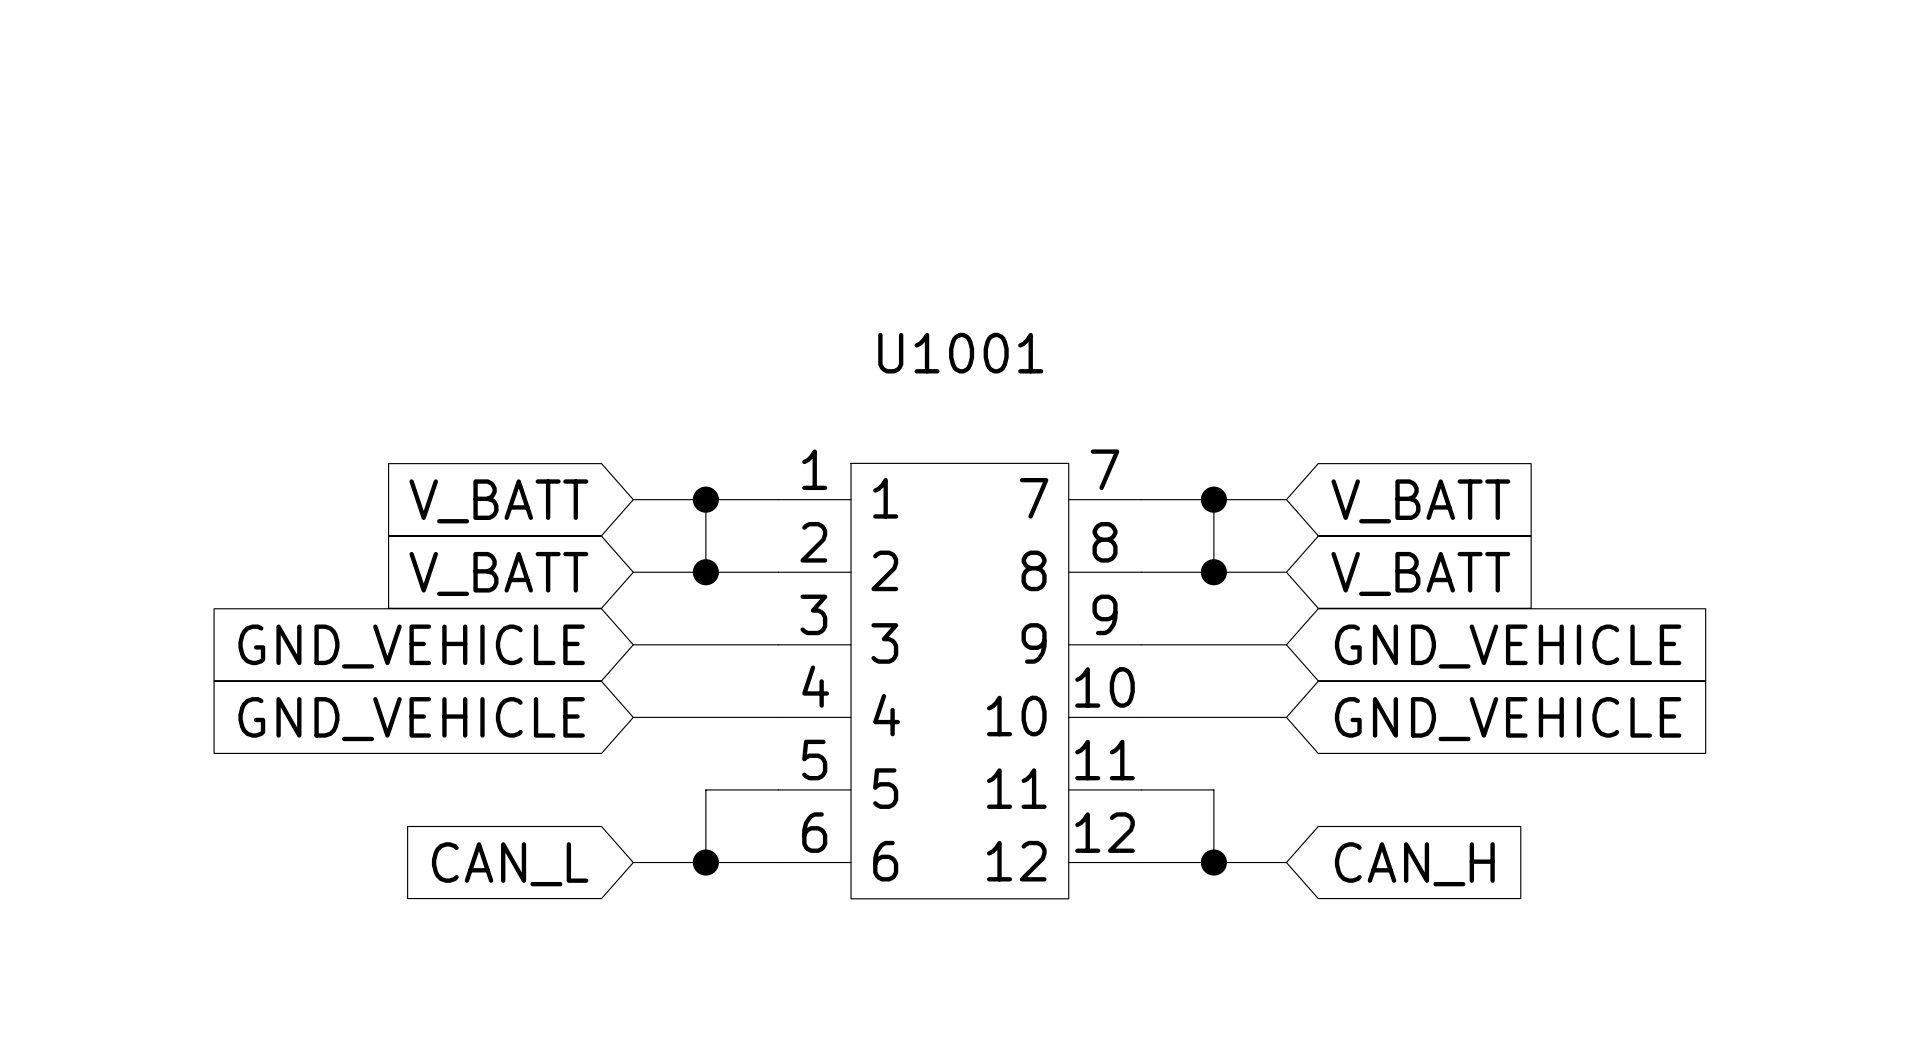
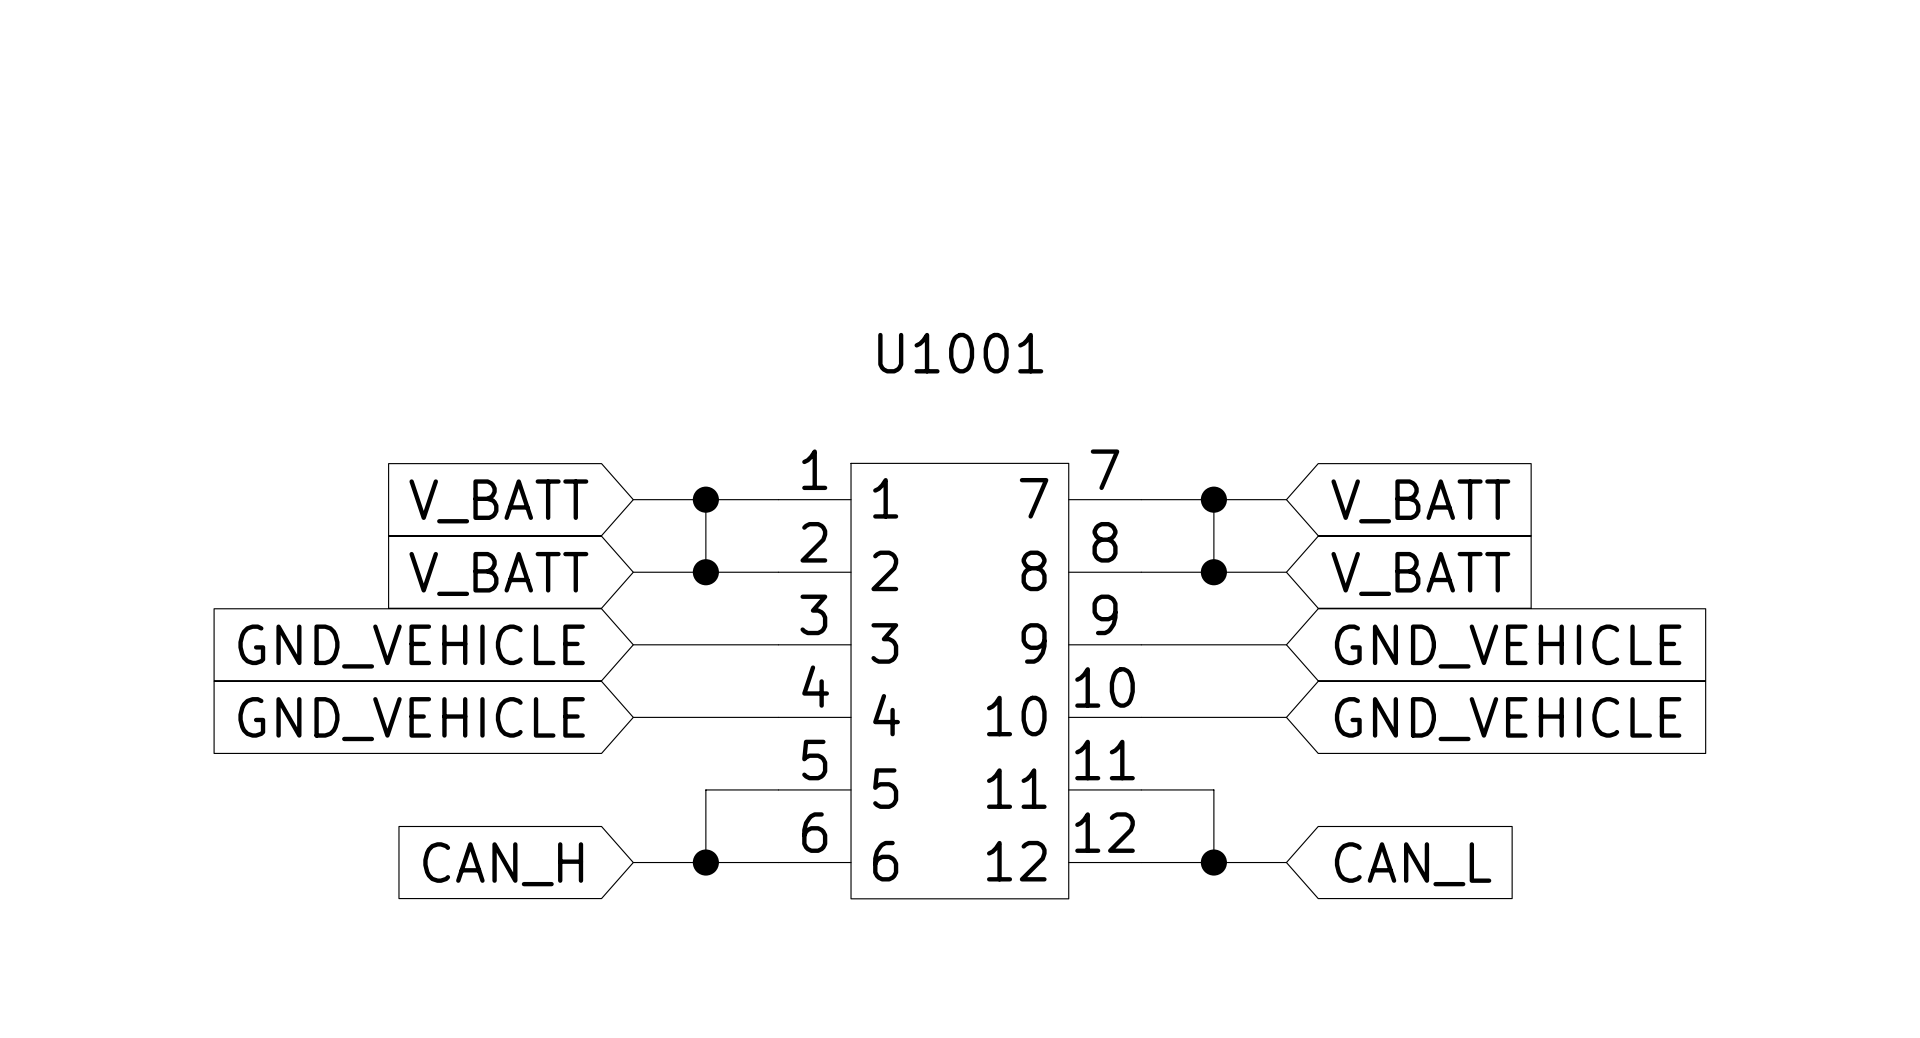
global label: CAN_L (510, 864) -> CAN_H (503, 864)
global label: CAN_H (1414, 864) -> CAN_L (1413, 864)

